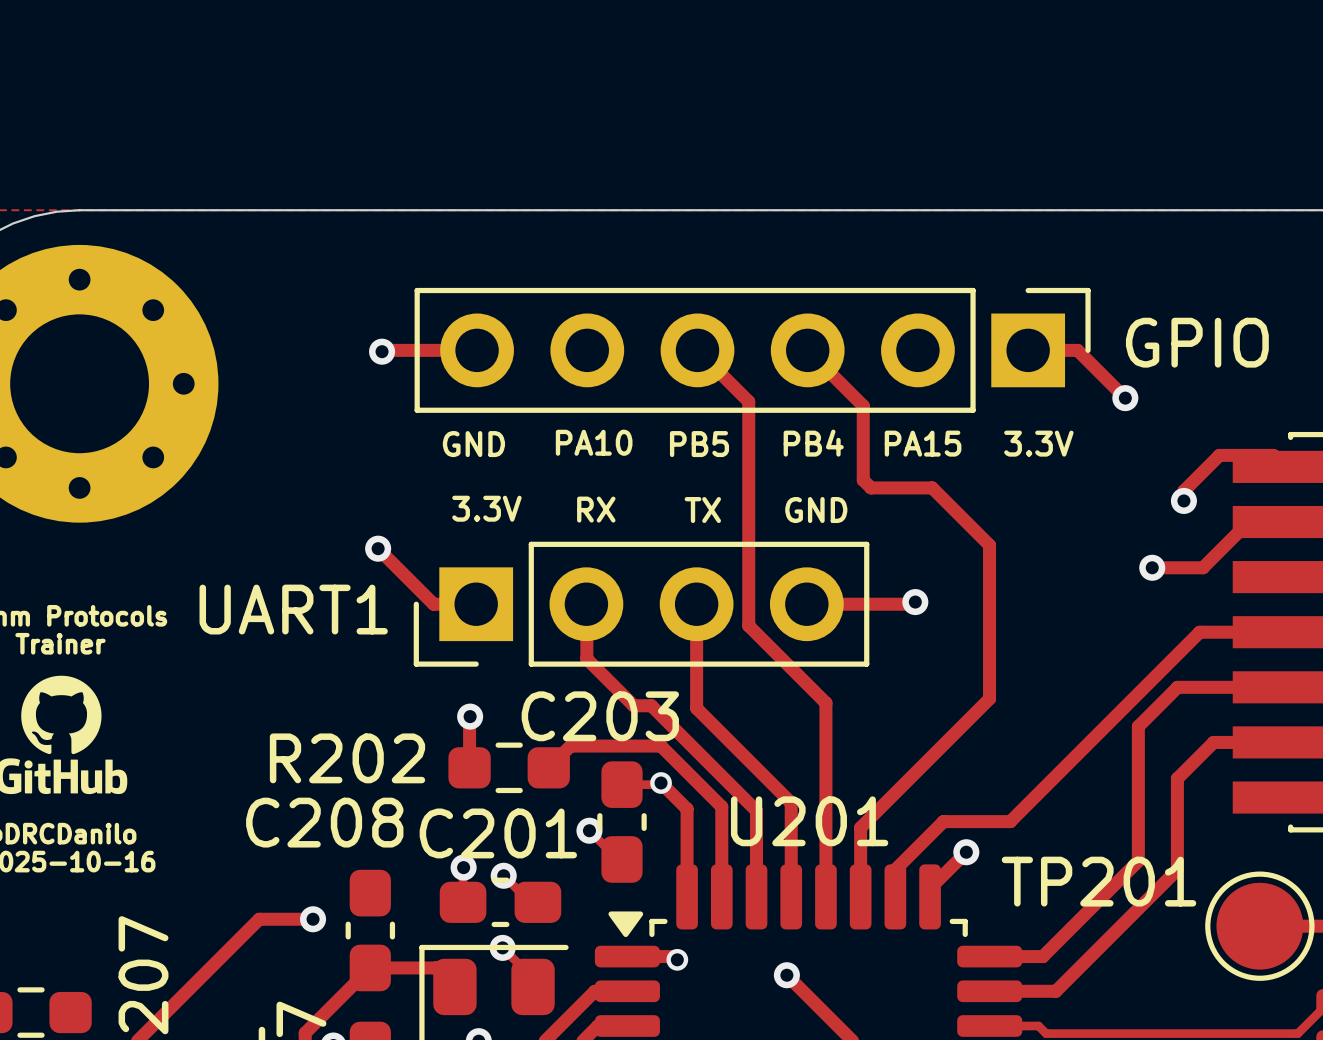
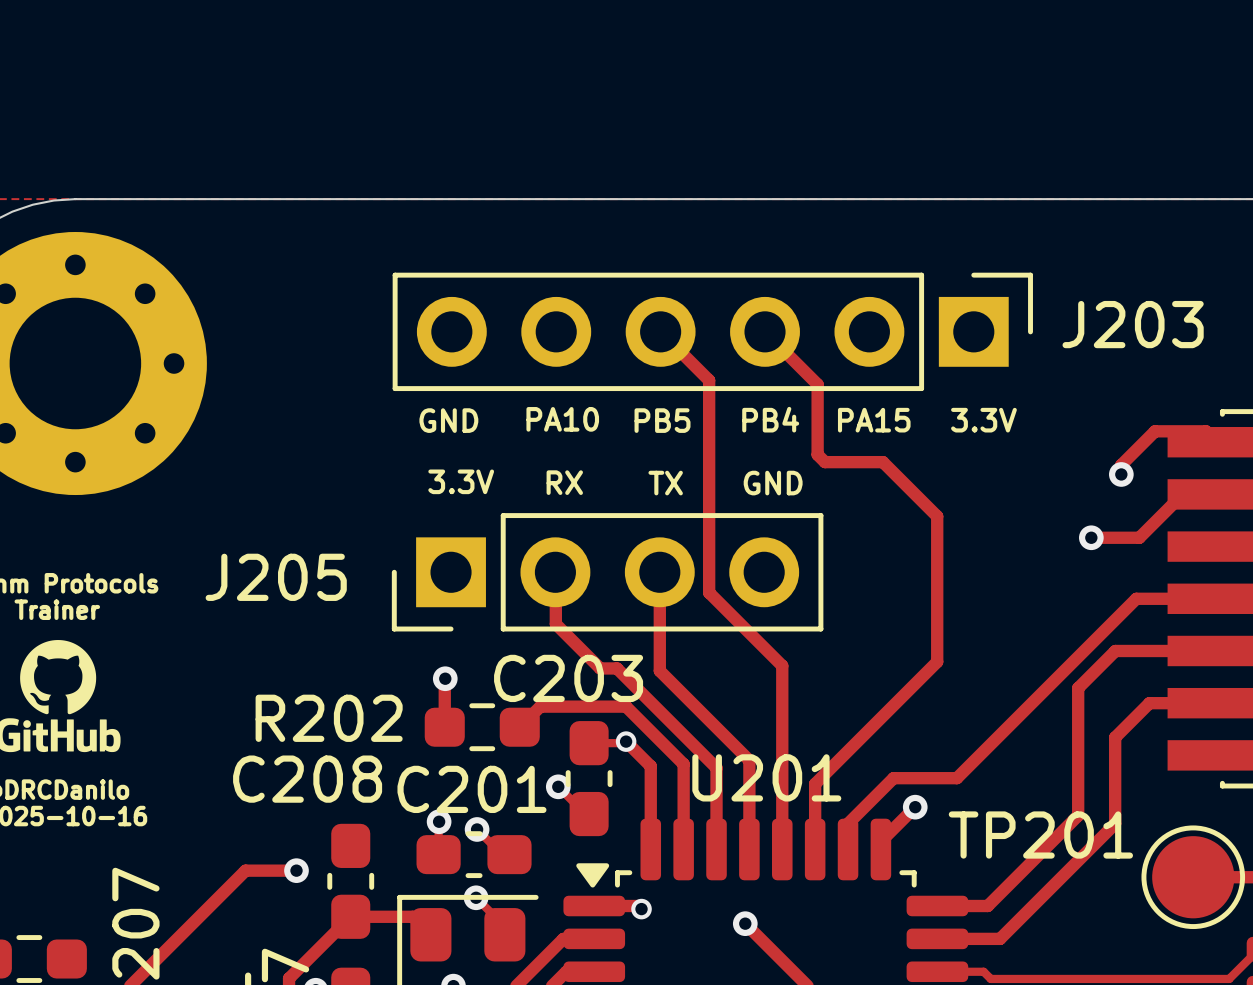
GPIO name: GPIO (1197, 342) -> J203 (1133, 324)
track: (477, 350) (382, 351) -> none
track: (1028, 350) (1077, 350) (1125, 398) -> none
via: (382, 351) -> none
via: (1125, 398) -> none
track: (378, 548) (433, 604) (476, 604) -> none
via: (378, 548) -> none
track: (915, 602) (913, 604) (806, 604) -> none
via: (915, 602) -> none
UART1 name: UART1 (293, 609) -> J205 (276, 577)

